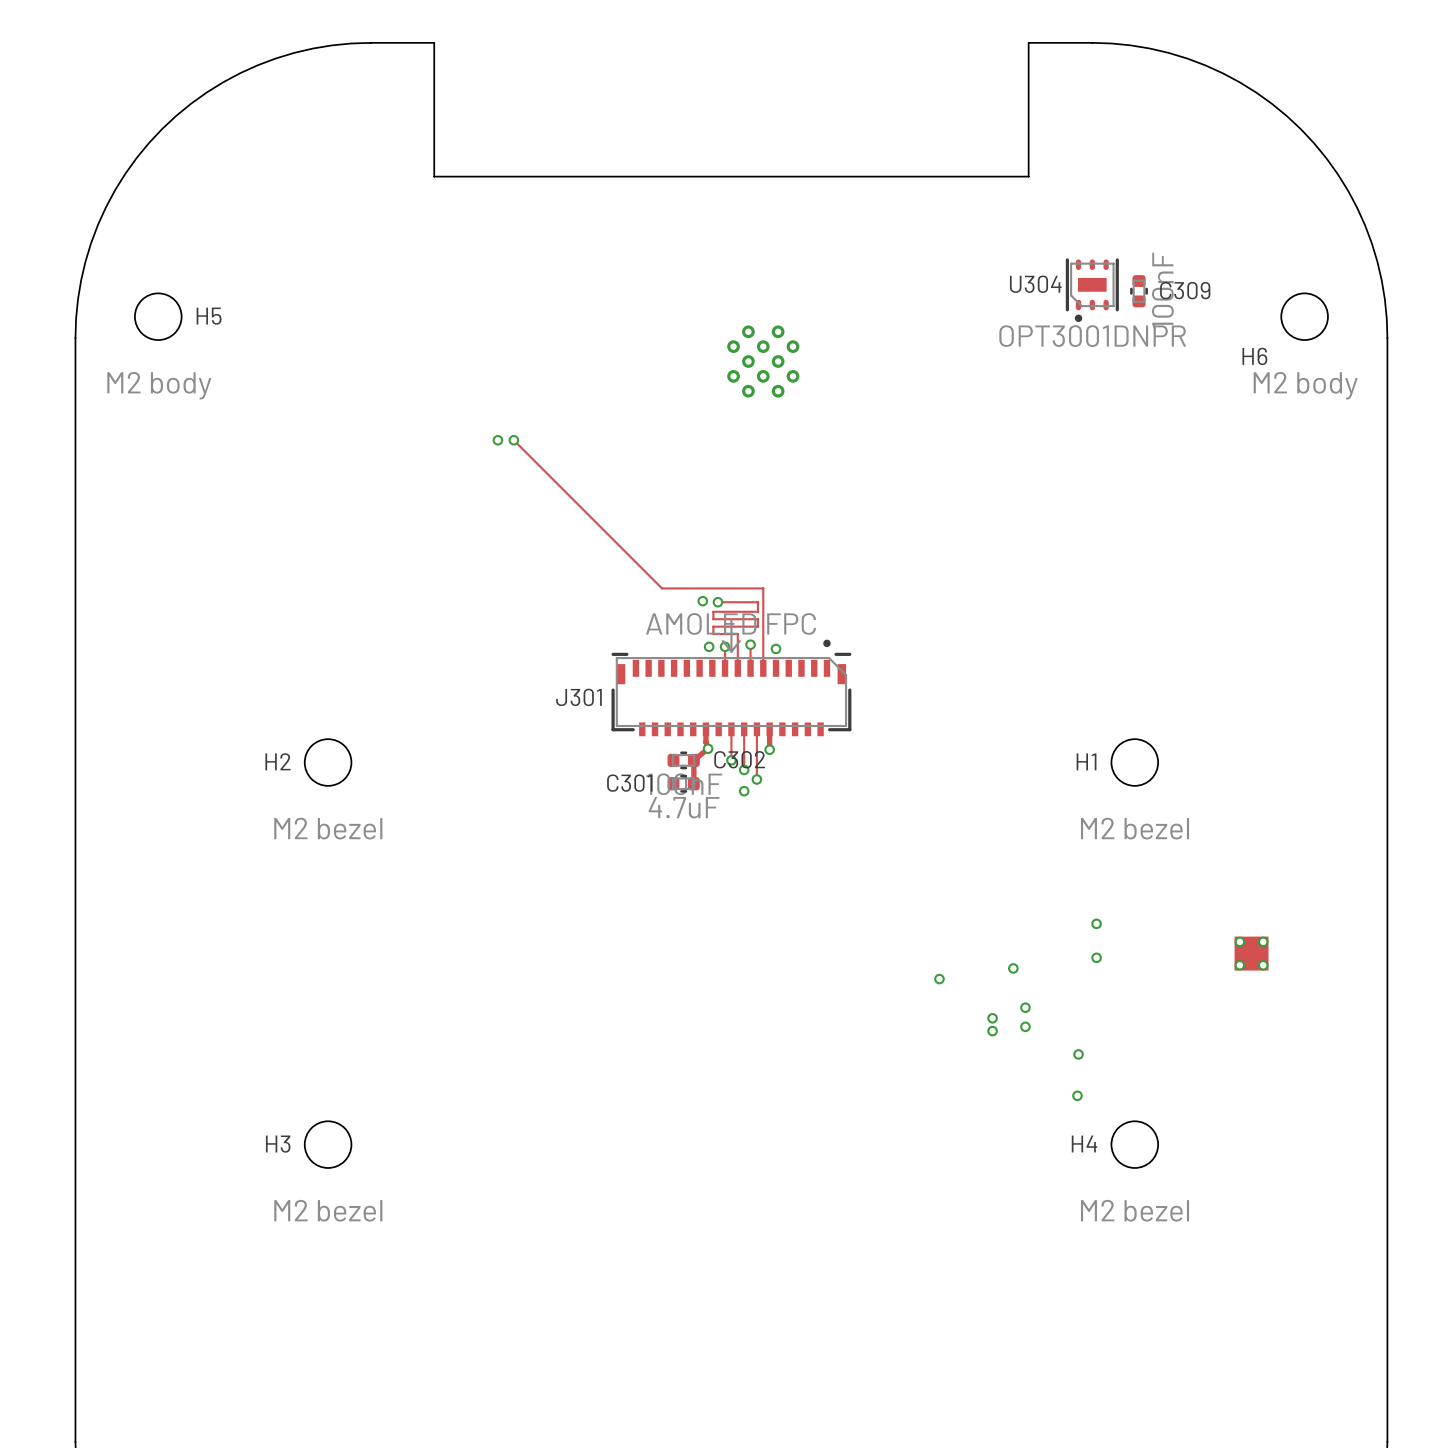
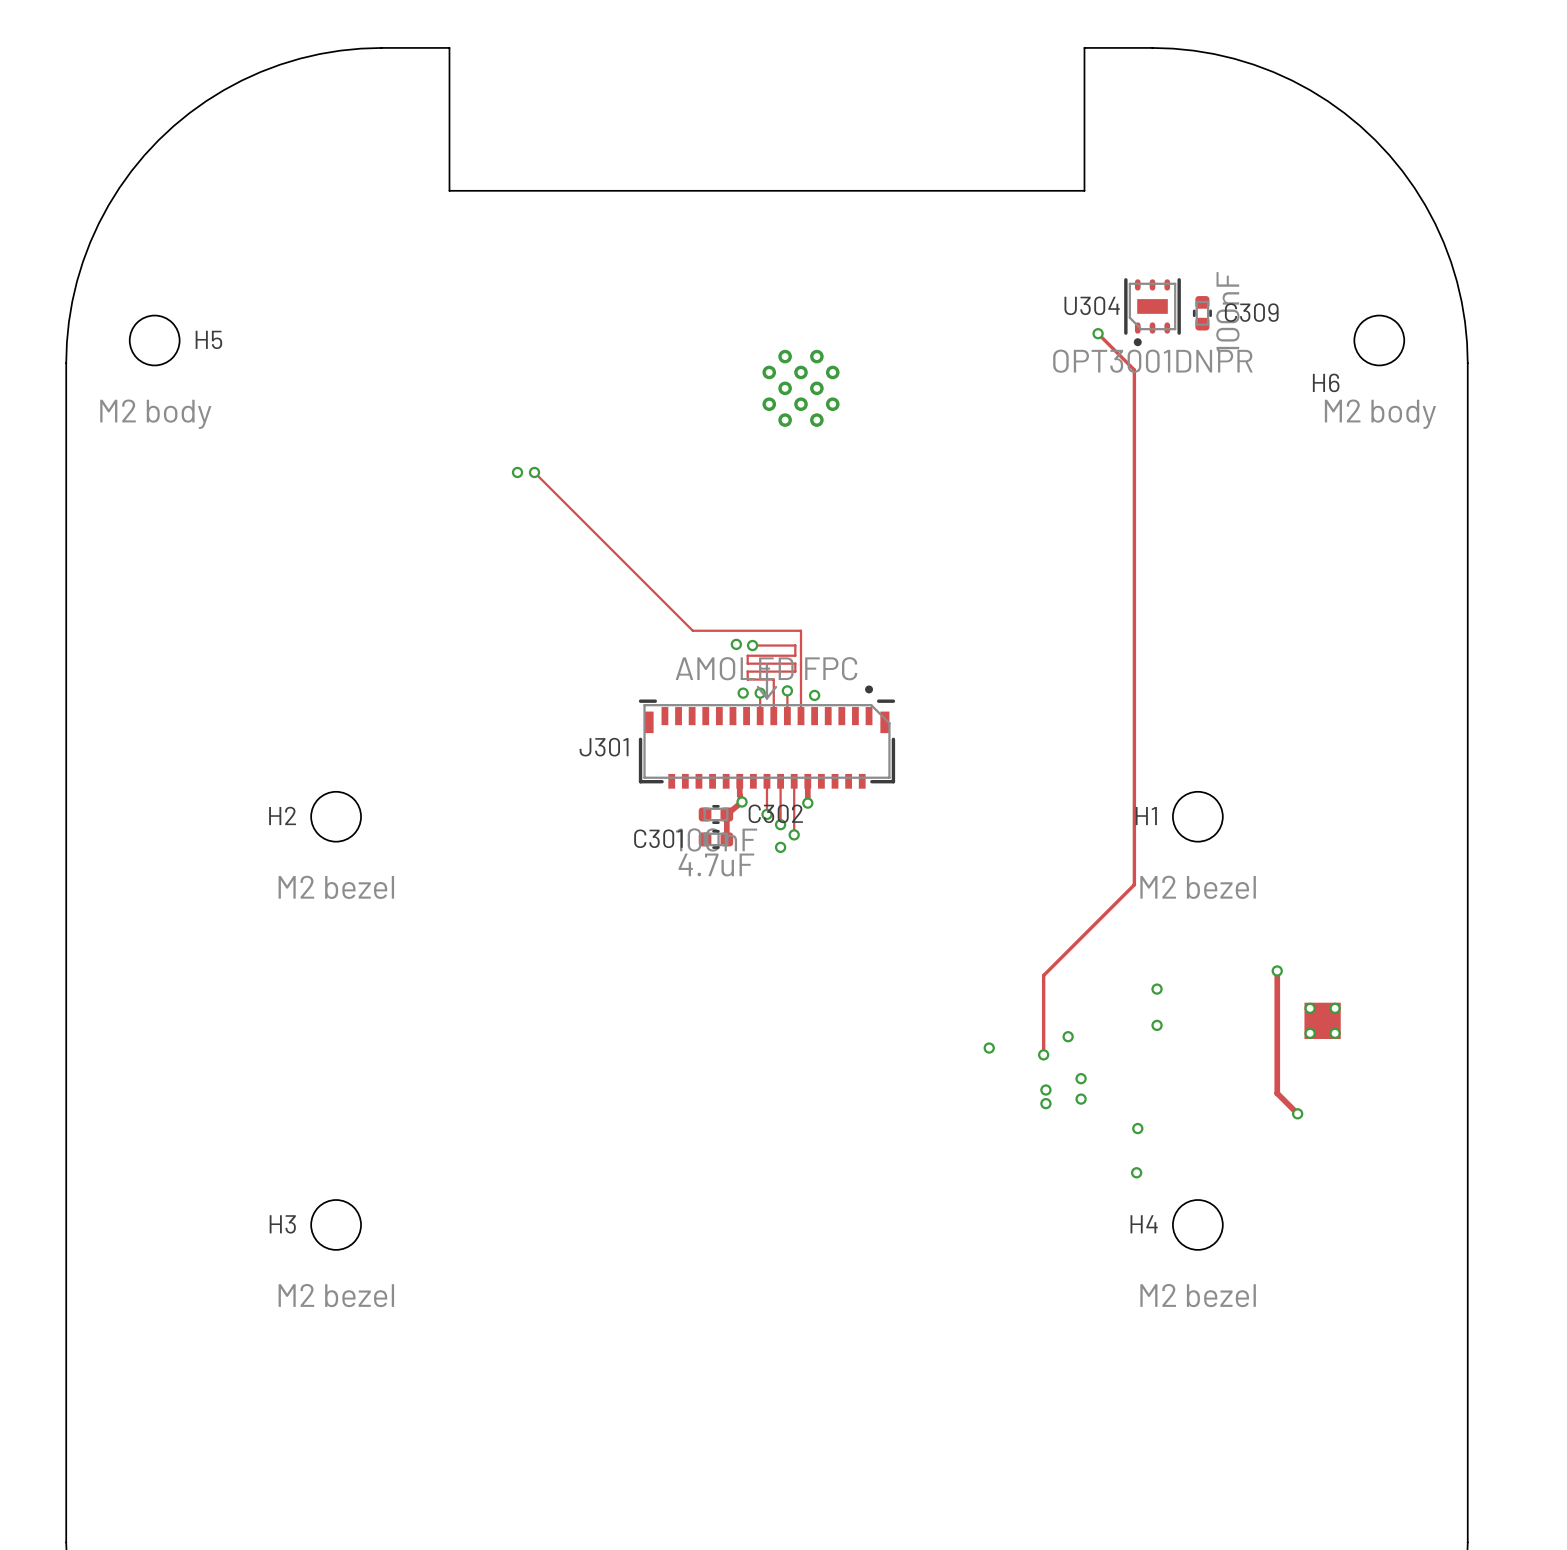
track: none -> (1098, 333) (1134, 369) (1134, 884) (1043, 975) (1043, 1054)
via: none -> (1098, 333)
track: none -> (1277, 970) (1277, 1093) (1297, 1113)
via: none -> (1277, 970)
via: none -> (1043, 1054)
via: none -> (1297, 1113)

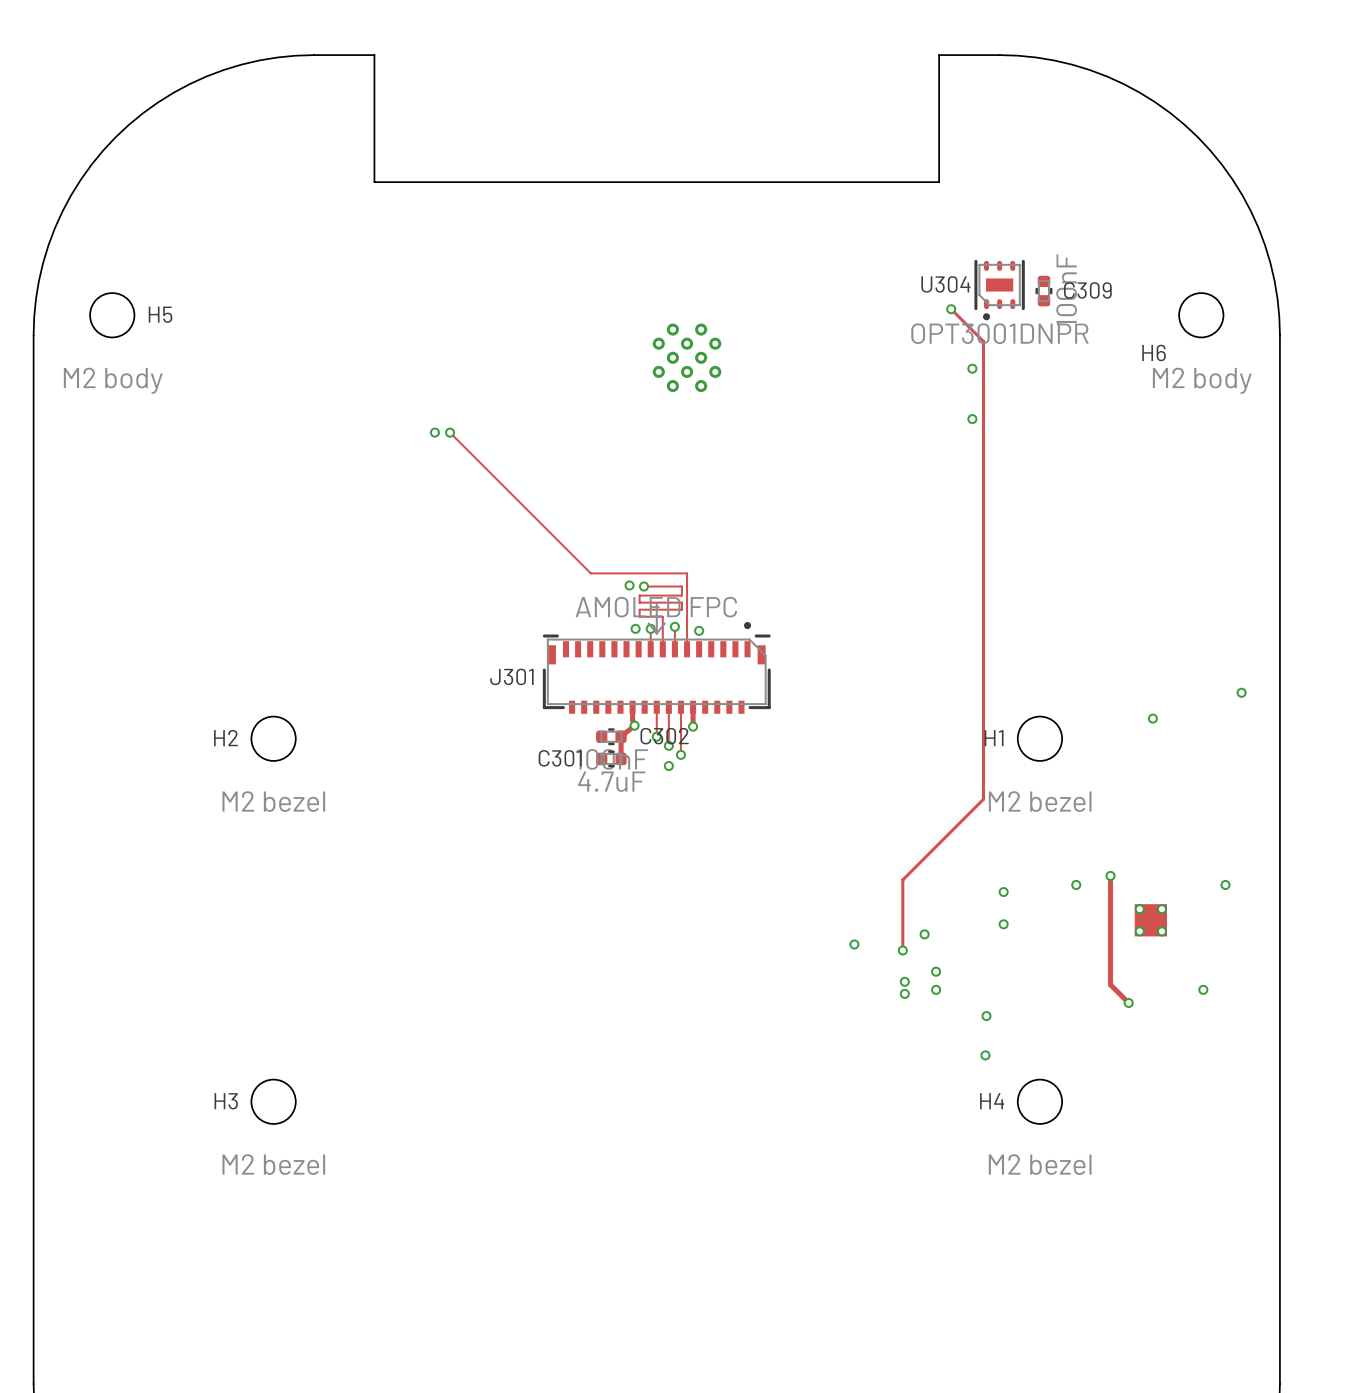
via: none -> (972, 368)
via: none -> (972, 419)
via: none -> (1241, 692)
via: none -> (1152, 718)
via: none -> (1076, 884)
via: none -> (1225, 884)
via: none -> (1203, 989)

